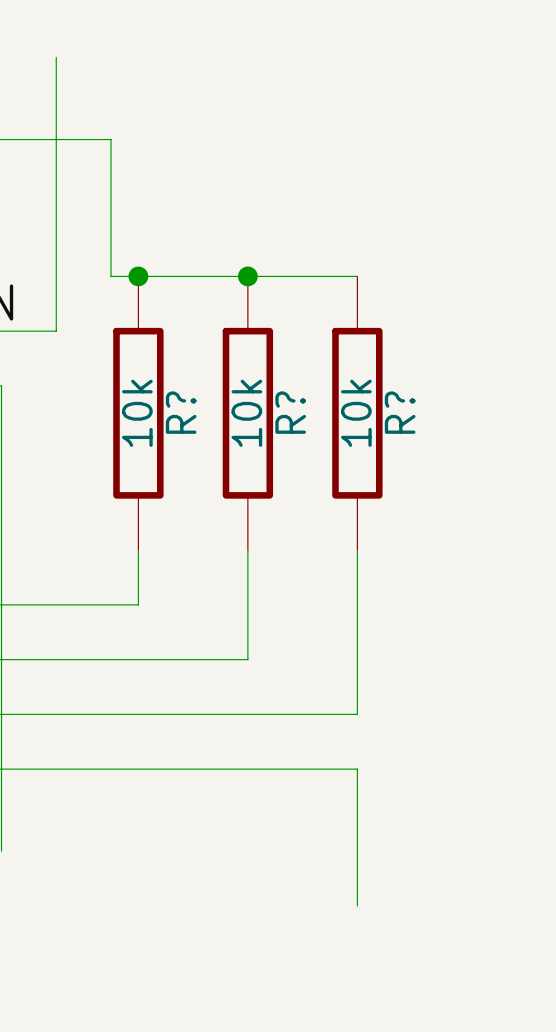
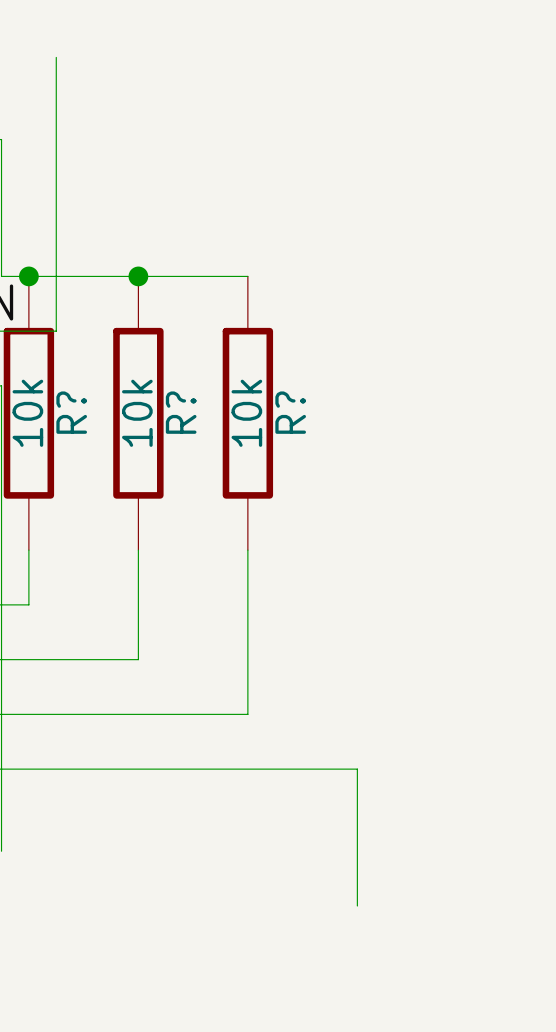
wire: (1, 139) (111, 139) (111, 276) -> (1, 139) (1, 276) (111, 276)
junction: none -> (28, 276)
wire: (247, 276) (357, 276) -> none
junction: (247, 276) -> none
R? position: (357, 413) -> (28, 413)
wire: none -> (28, 550) (28, 604)
wire: (357, 550) (357, 714) (247, 714) -> none
wire: (28, 604) (138, 604) -> (138, 659) (138, 604)
wire: (138, 659) (247, 659) -> (247, 714) (247, 659)

